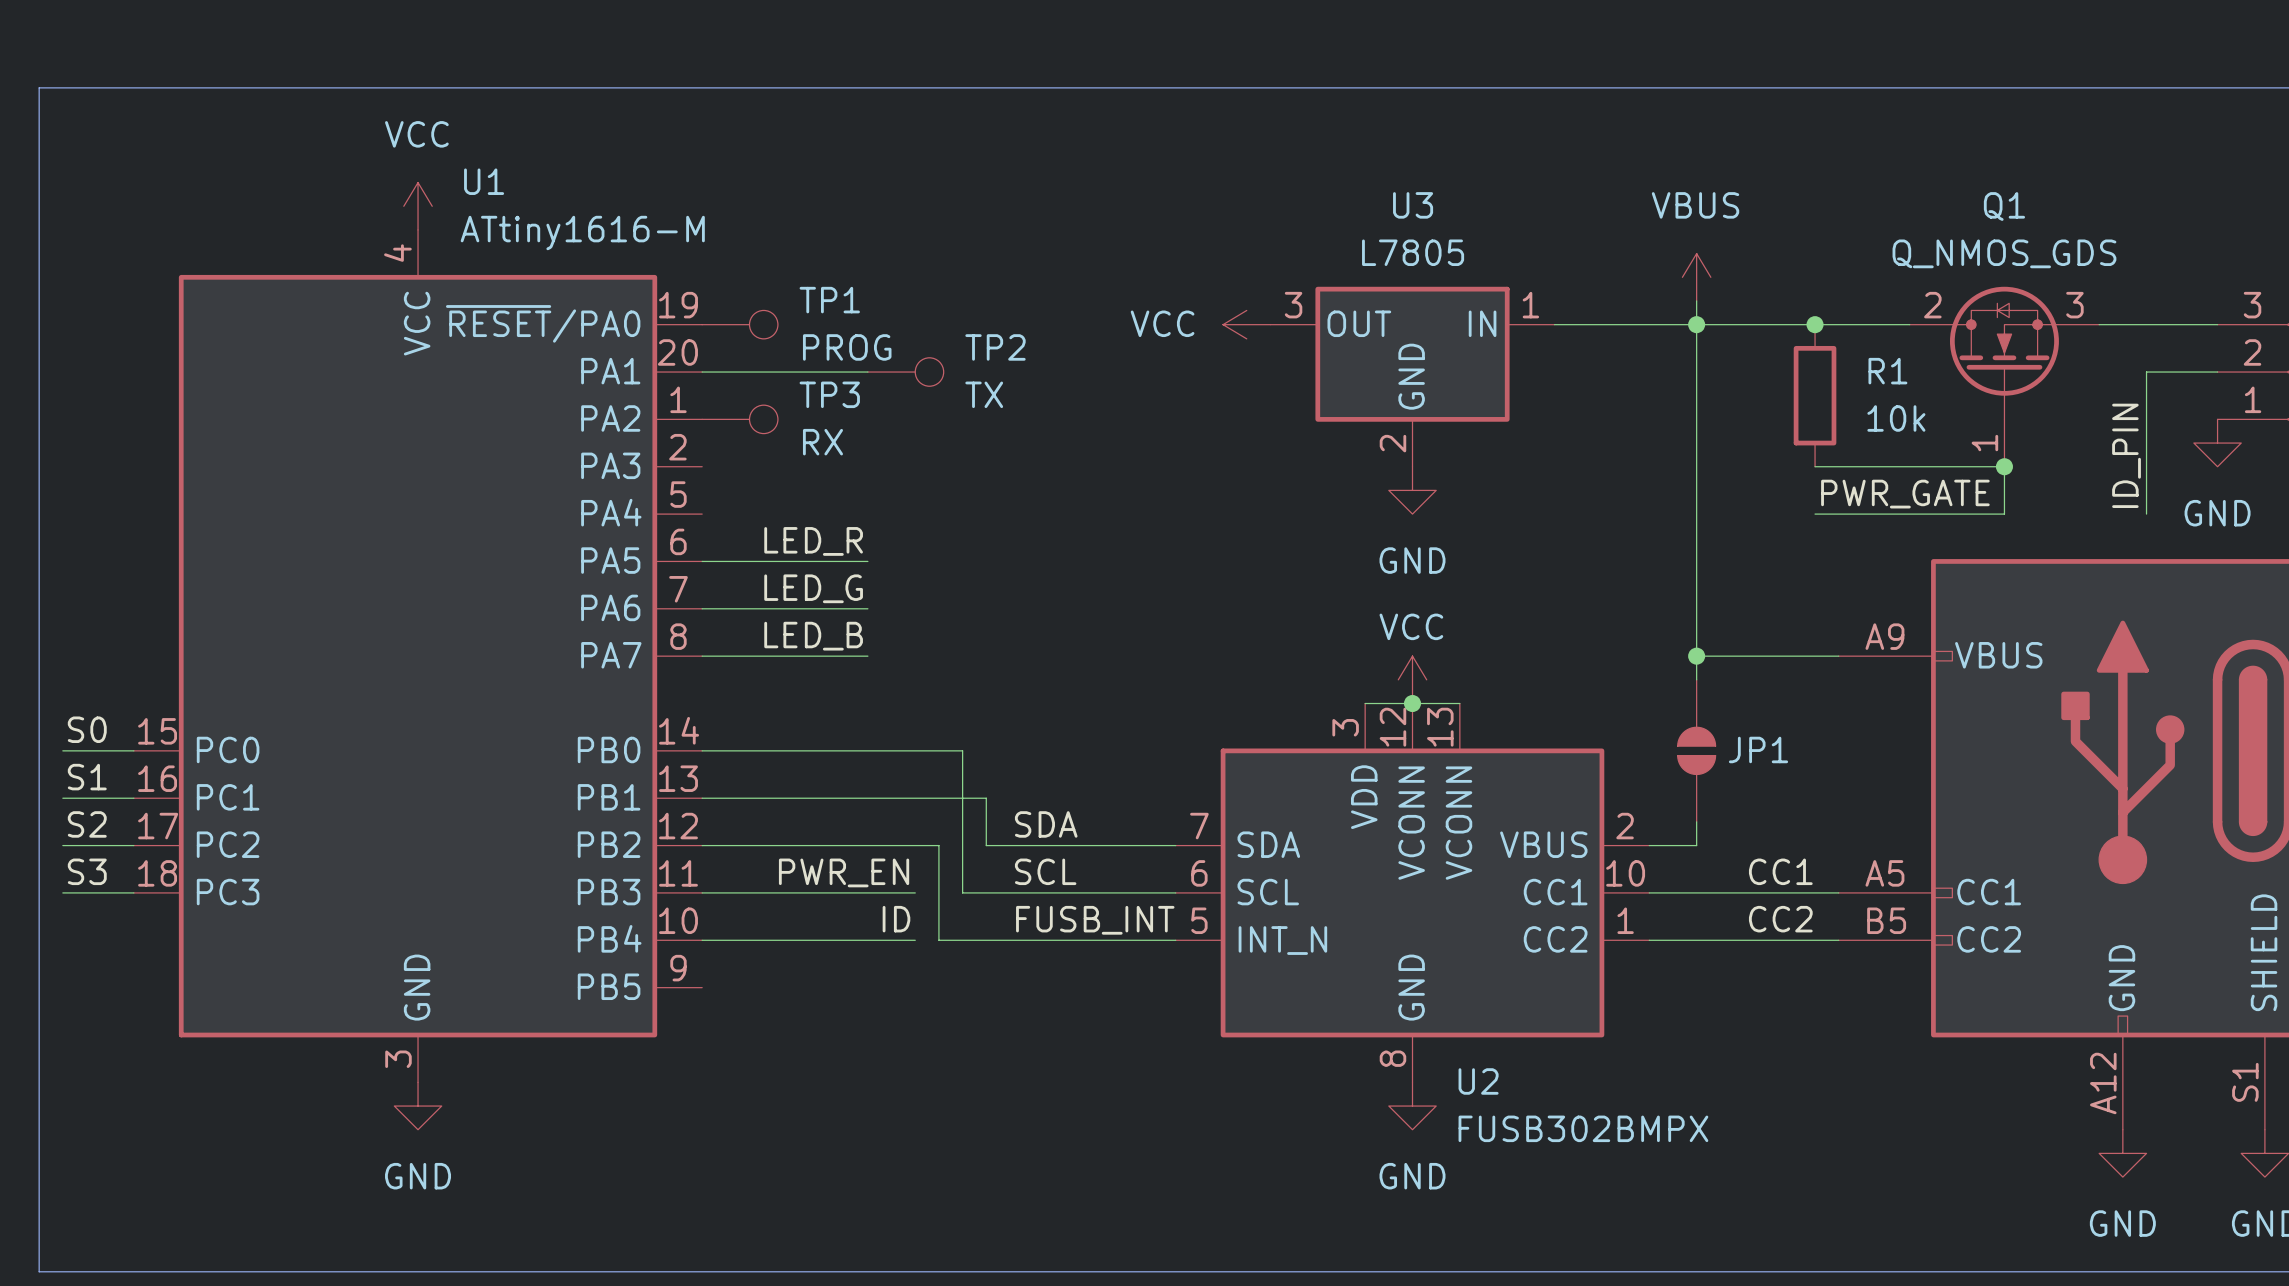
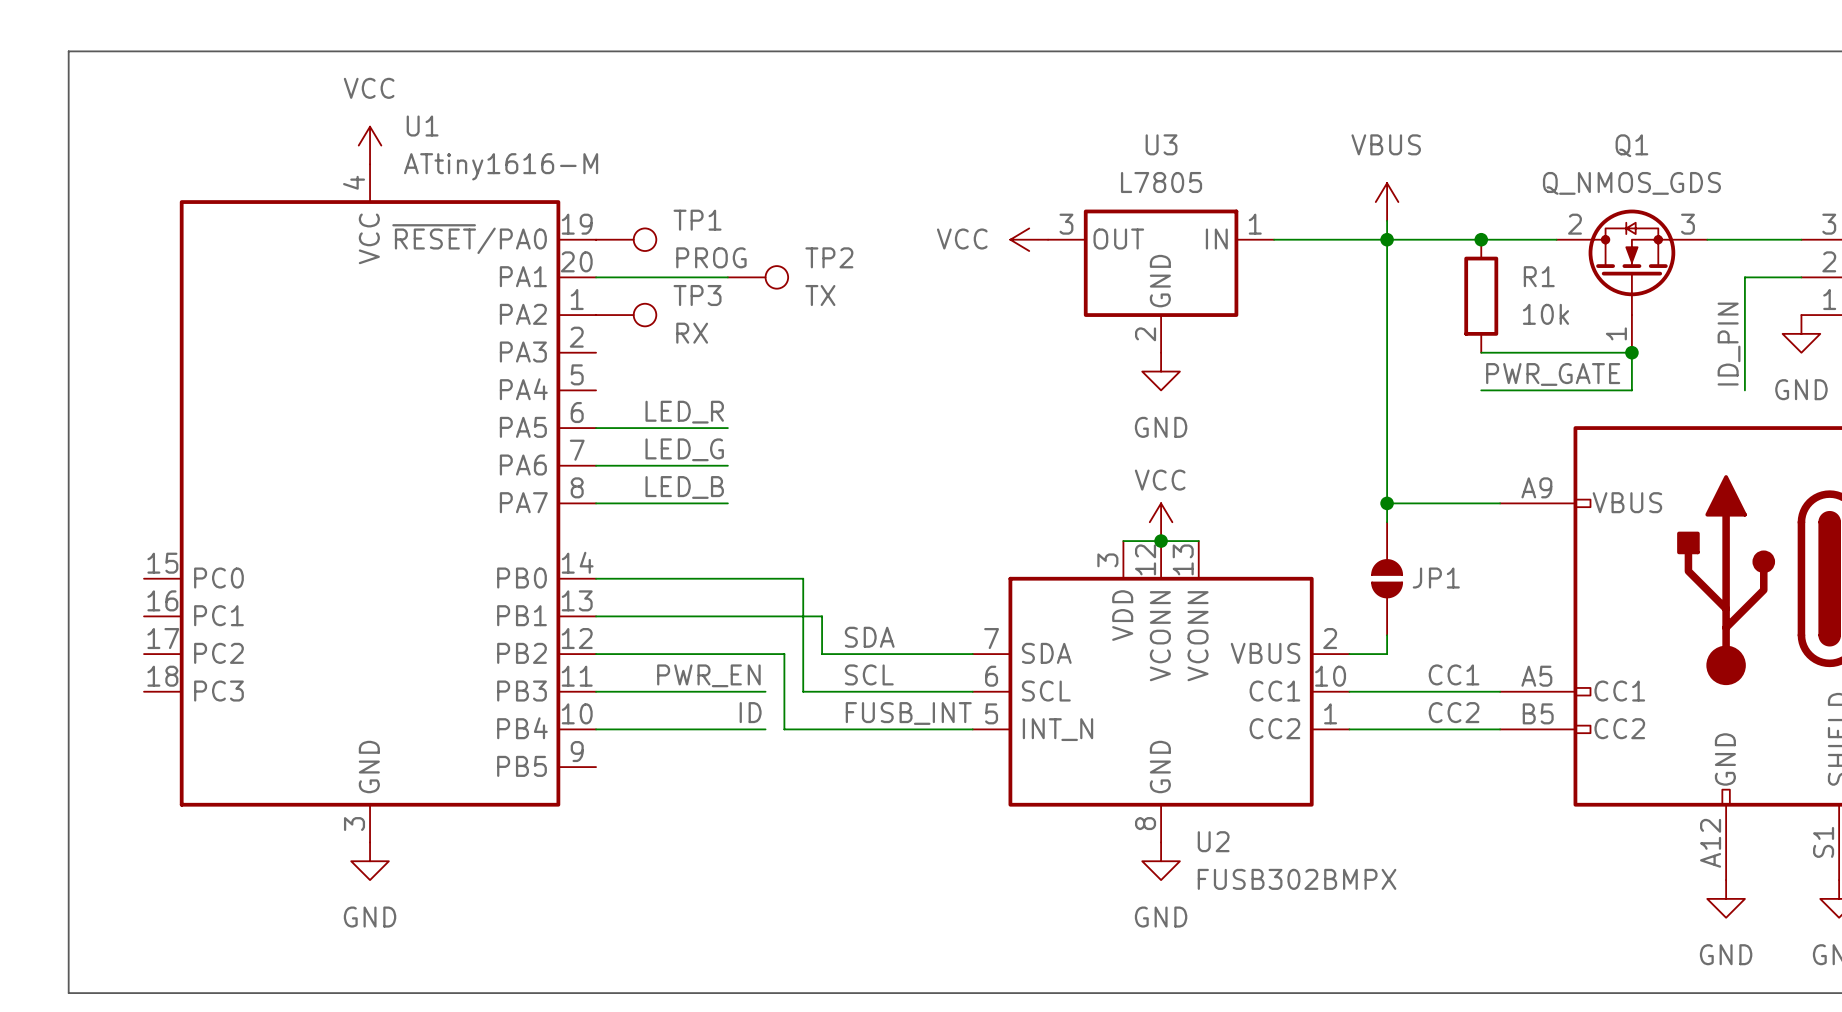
label: S0 (87, 729) -> none
wire: (62, 750) (133, 750) -> none
label: S1 (87, 777) -> none
wire: (62, 798) (133, 798) -> none
label: S2 (87, 824) -> none
wire: (62, 845) (133, 845) -> none
label: S3 (87, 871) -> none
wire: (62, 892) (133, 892) -> none

